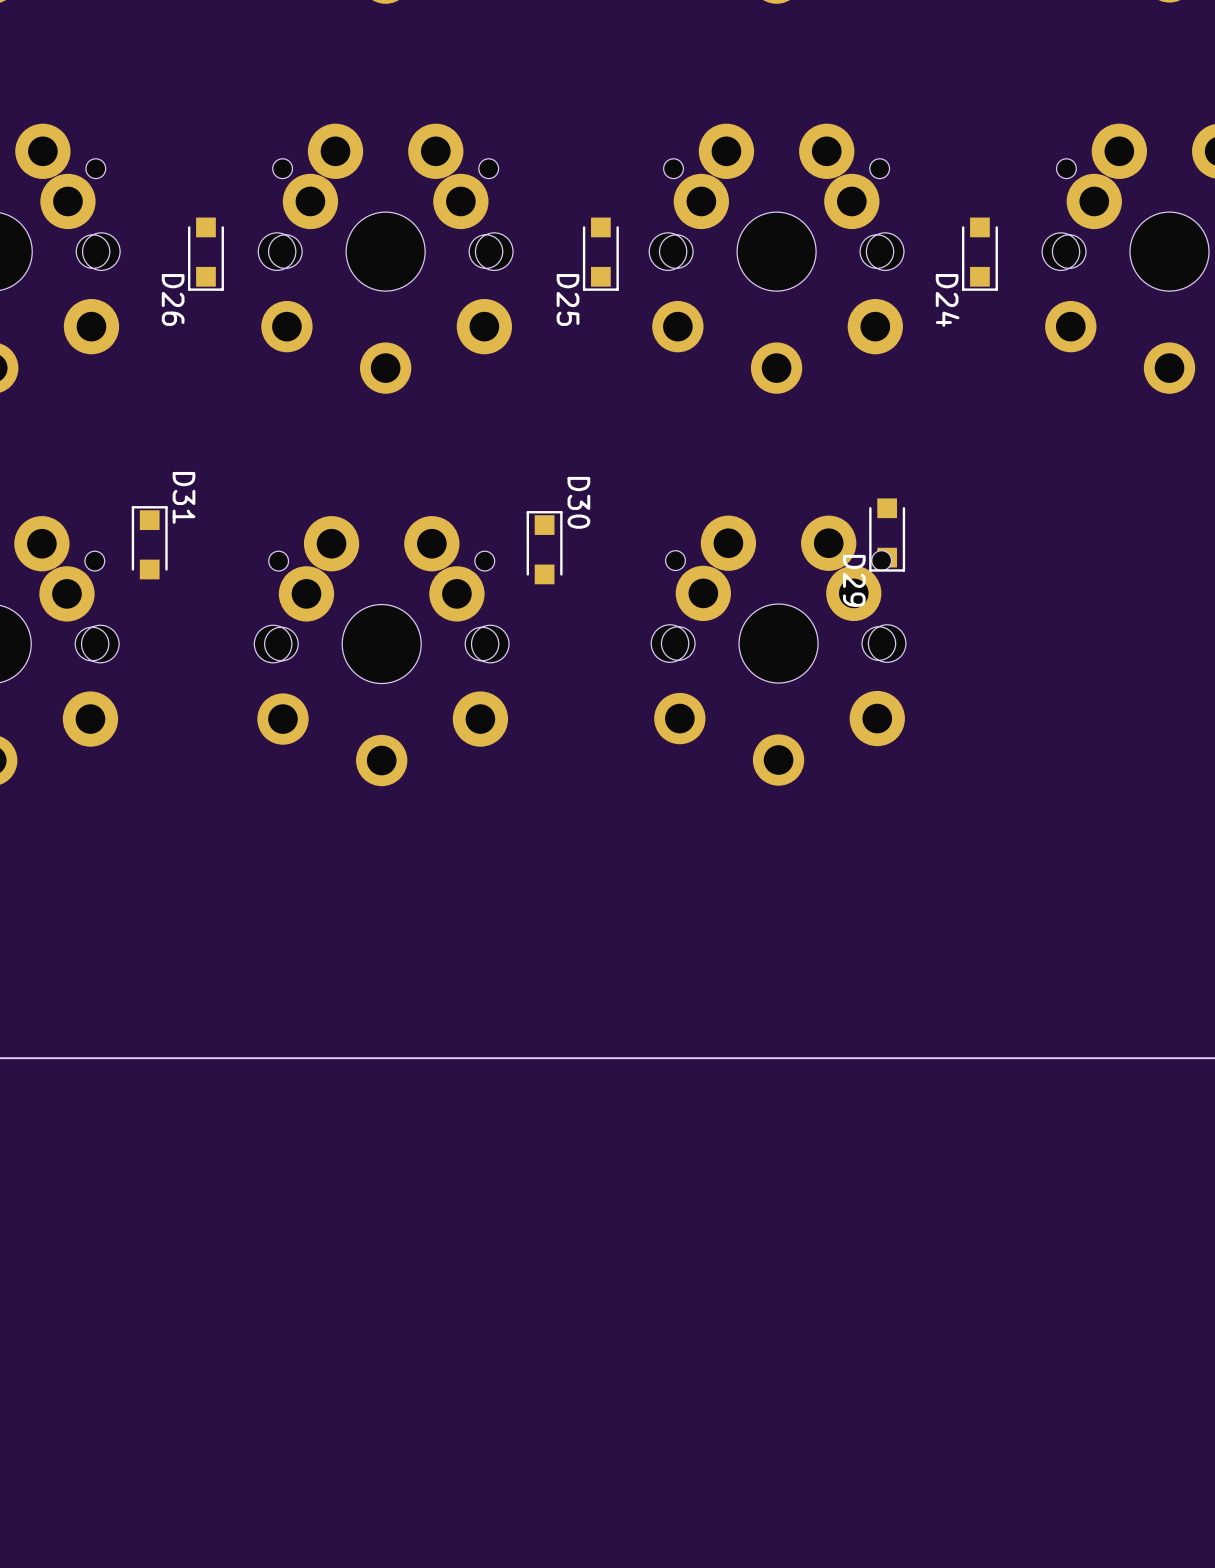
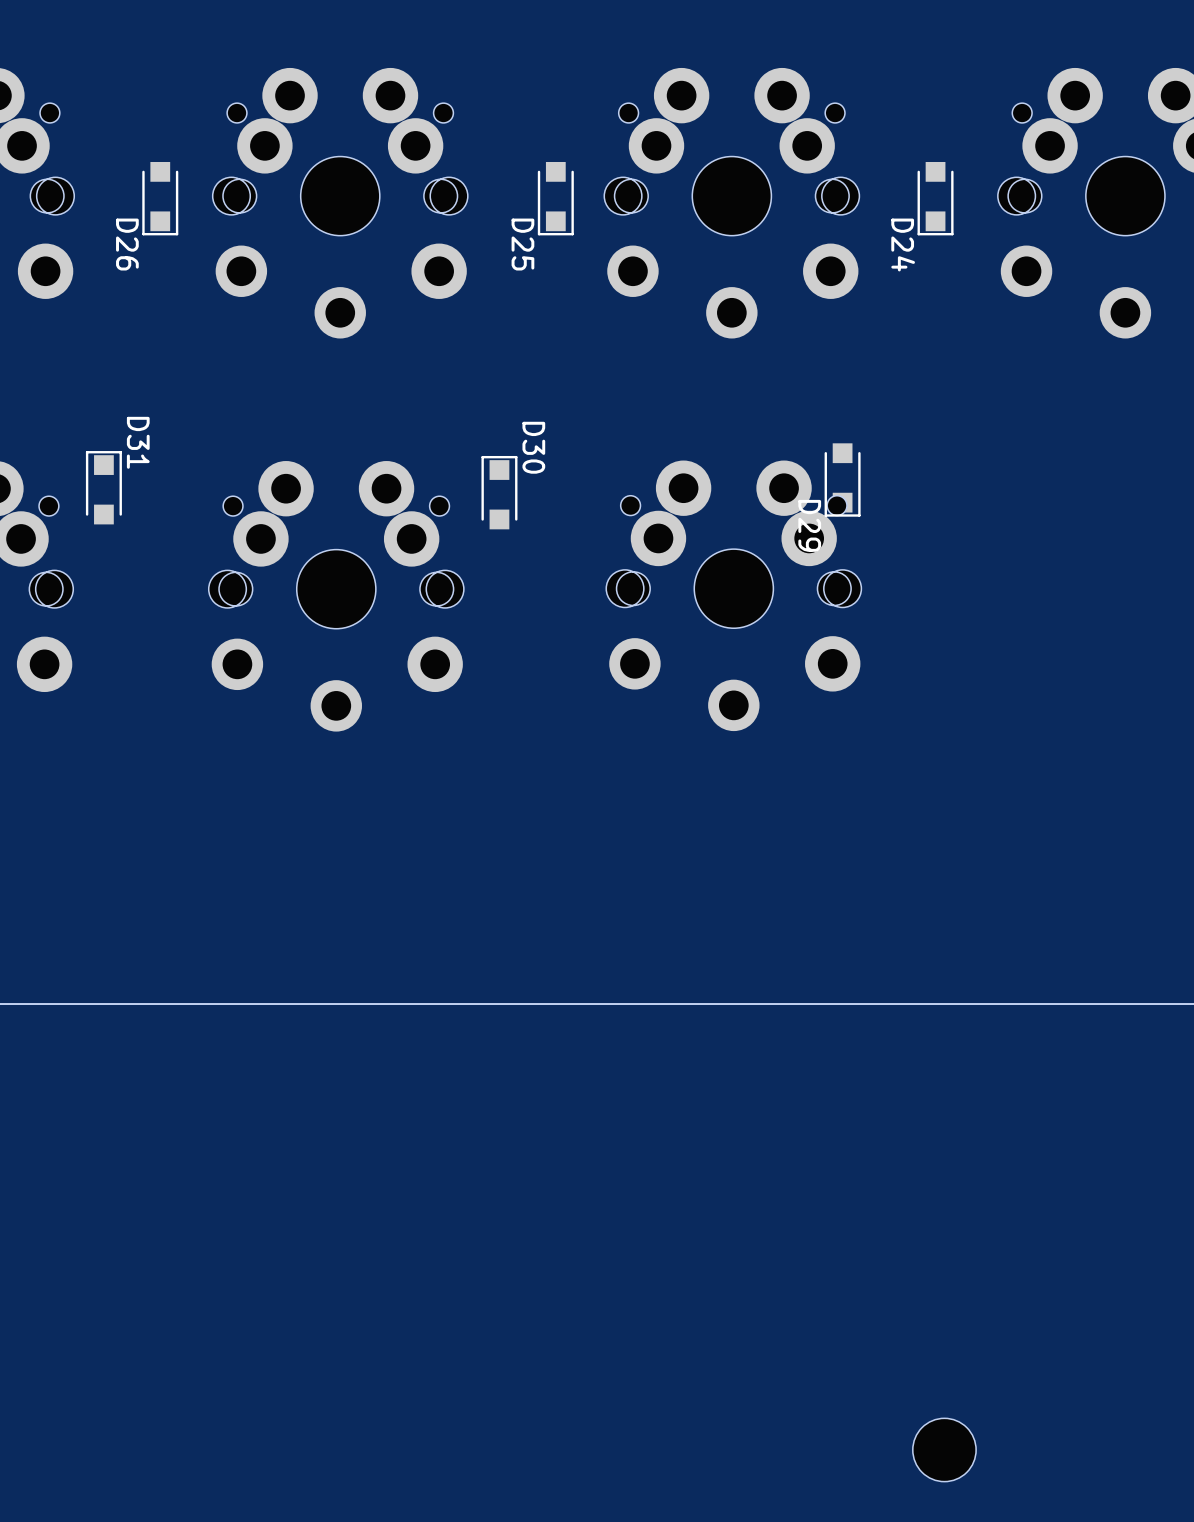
part: none -> (944, 1449)

